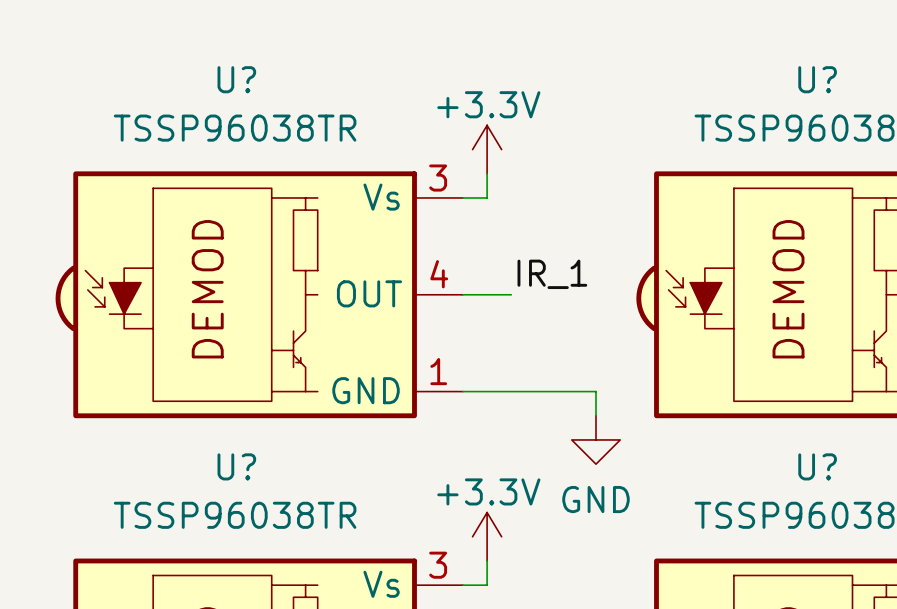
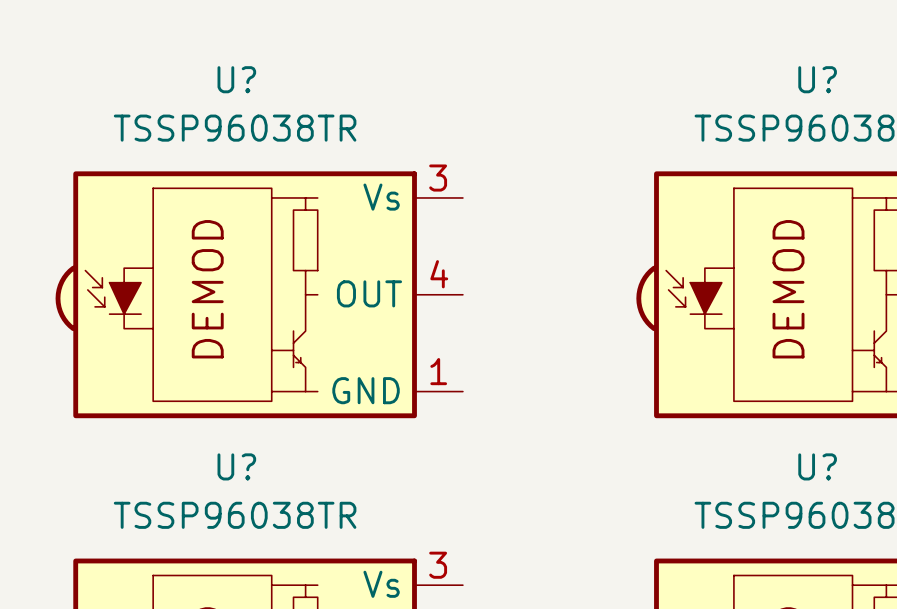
power symbol: +3.3V (487, 149) -> none
wire: (487, 173) (487, 197) (462, 197) -> none
label: IR_1 (552, 274) -> none
wire: (462, 294) (511, 294) -> none
wire: (462, 391) (595, 391) (595, 415) -> none
power symbol: GND (595, 439) -> none
power symbol: +3.3V (487, 536) -> none
wire: (487, 560) (487, 585) (462, 585) -> none

